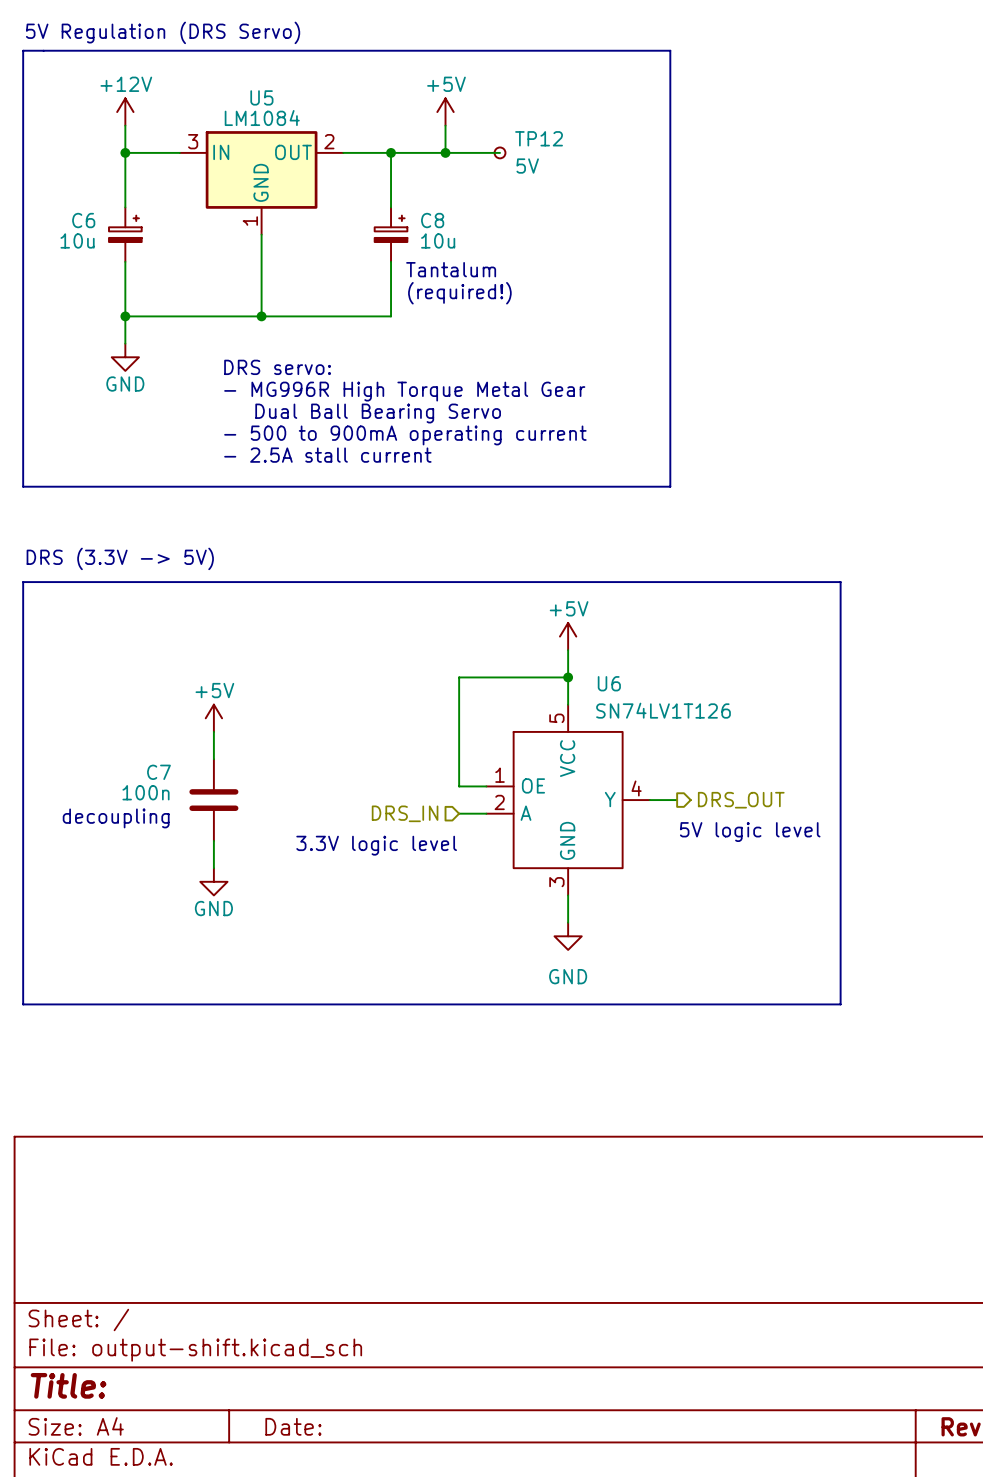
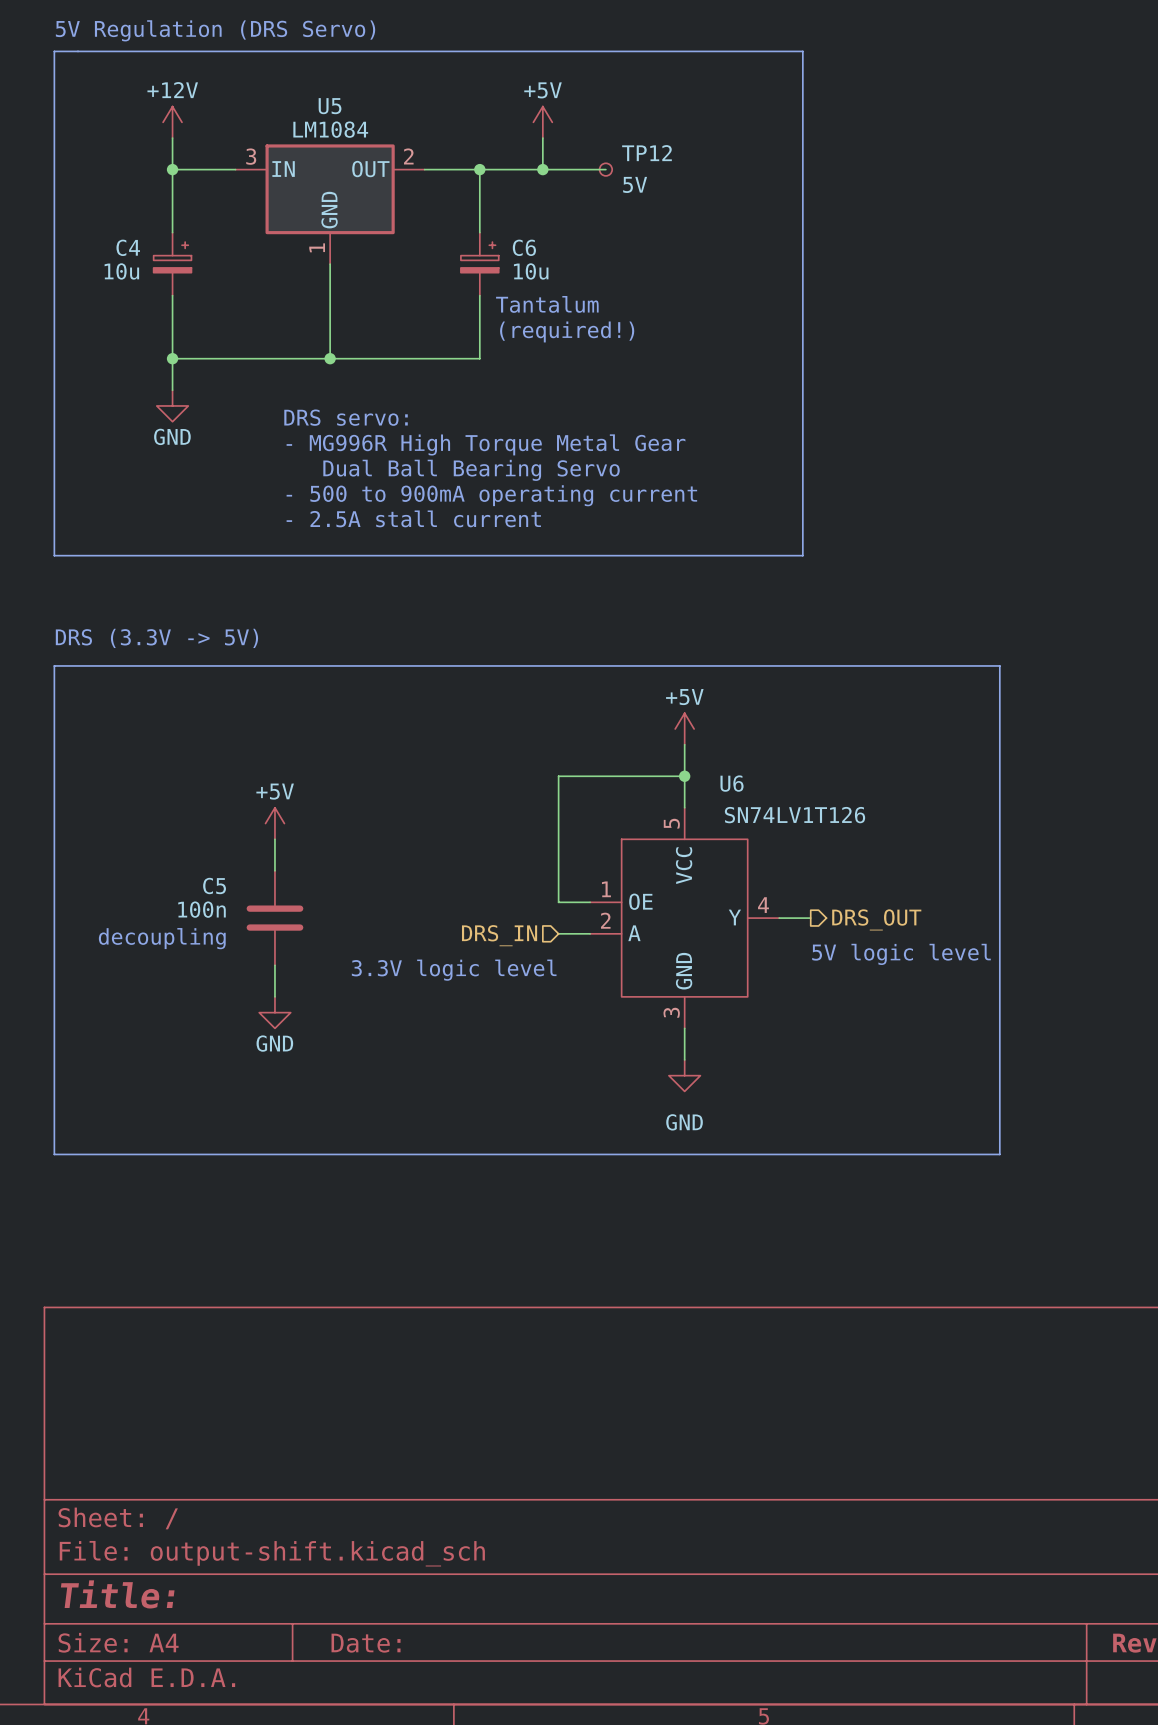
C6 name: C6 (83, 220) -> C4 (128, 247)
C8 name: C8 (432, 220) -> C6 (524, 247)
C7 name: C7 (158, 772) -> C5 (214, 885)

